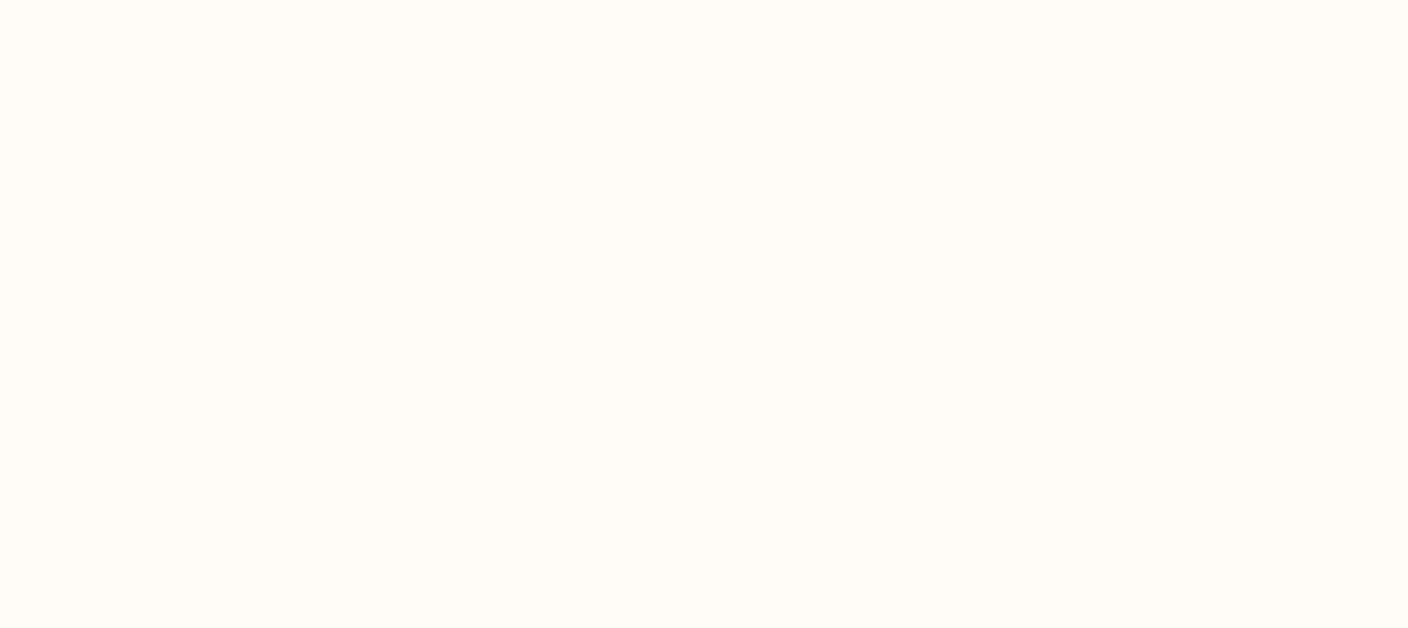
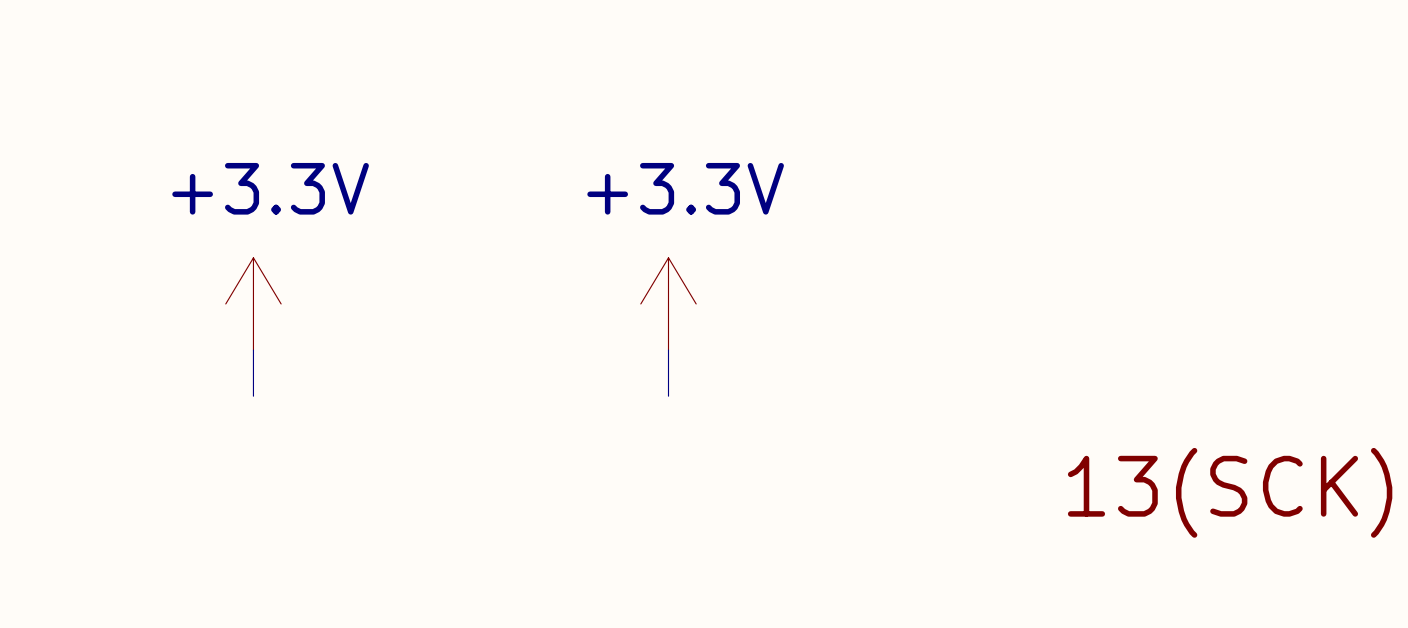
power symbol: none -> +3.3V (253, 303)
power symbol: none -> +3.3V (668, 303)
wire: none -> (253, 350) (253, 396)
wire: none -> (668, 350) (668, 396)
label: none -> 13(SCK) (1230, 492)

